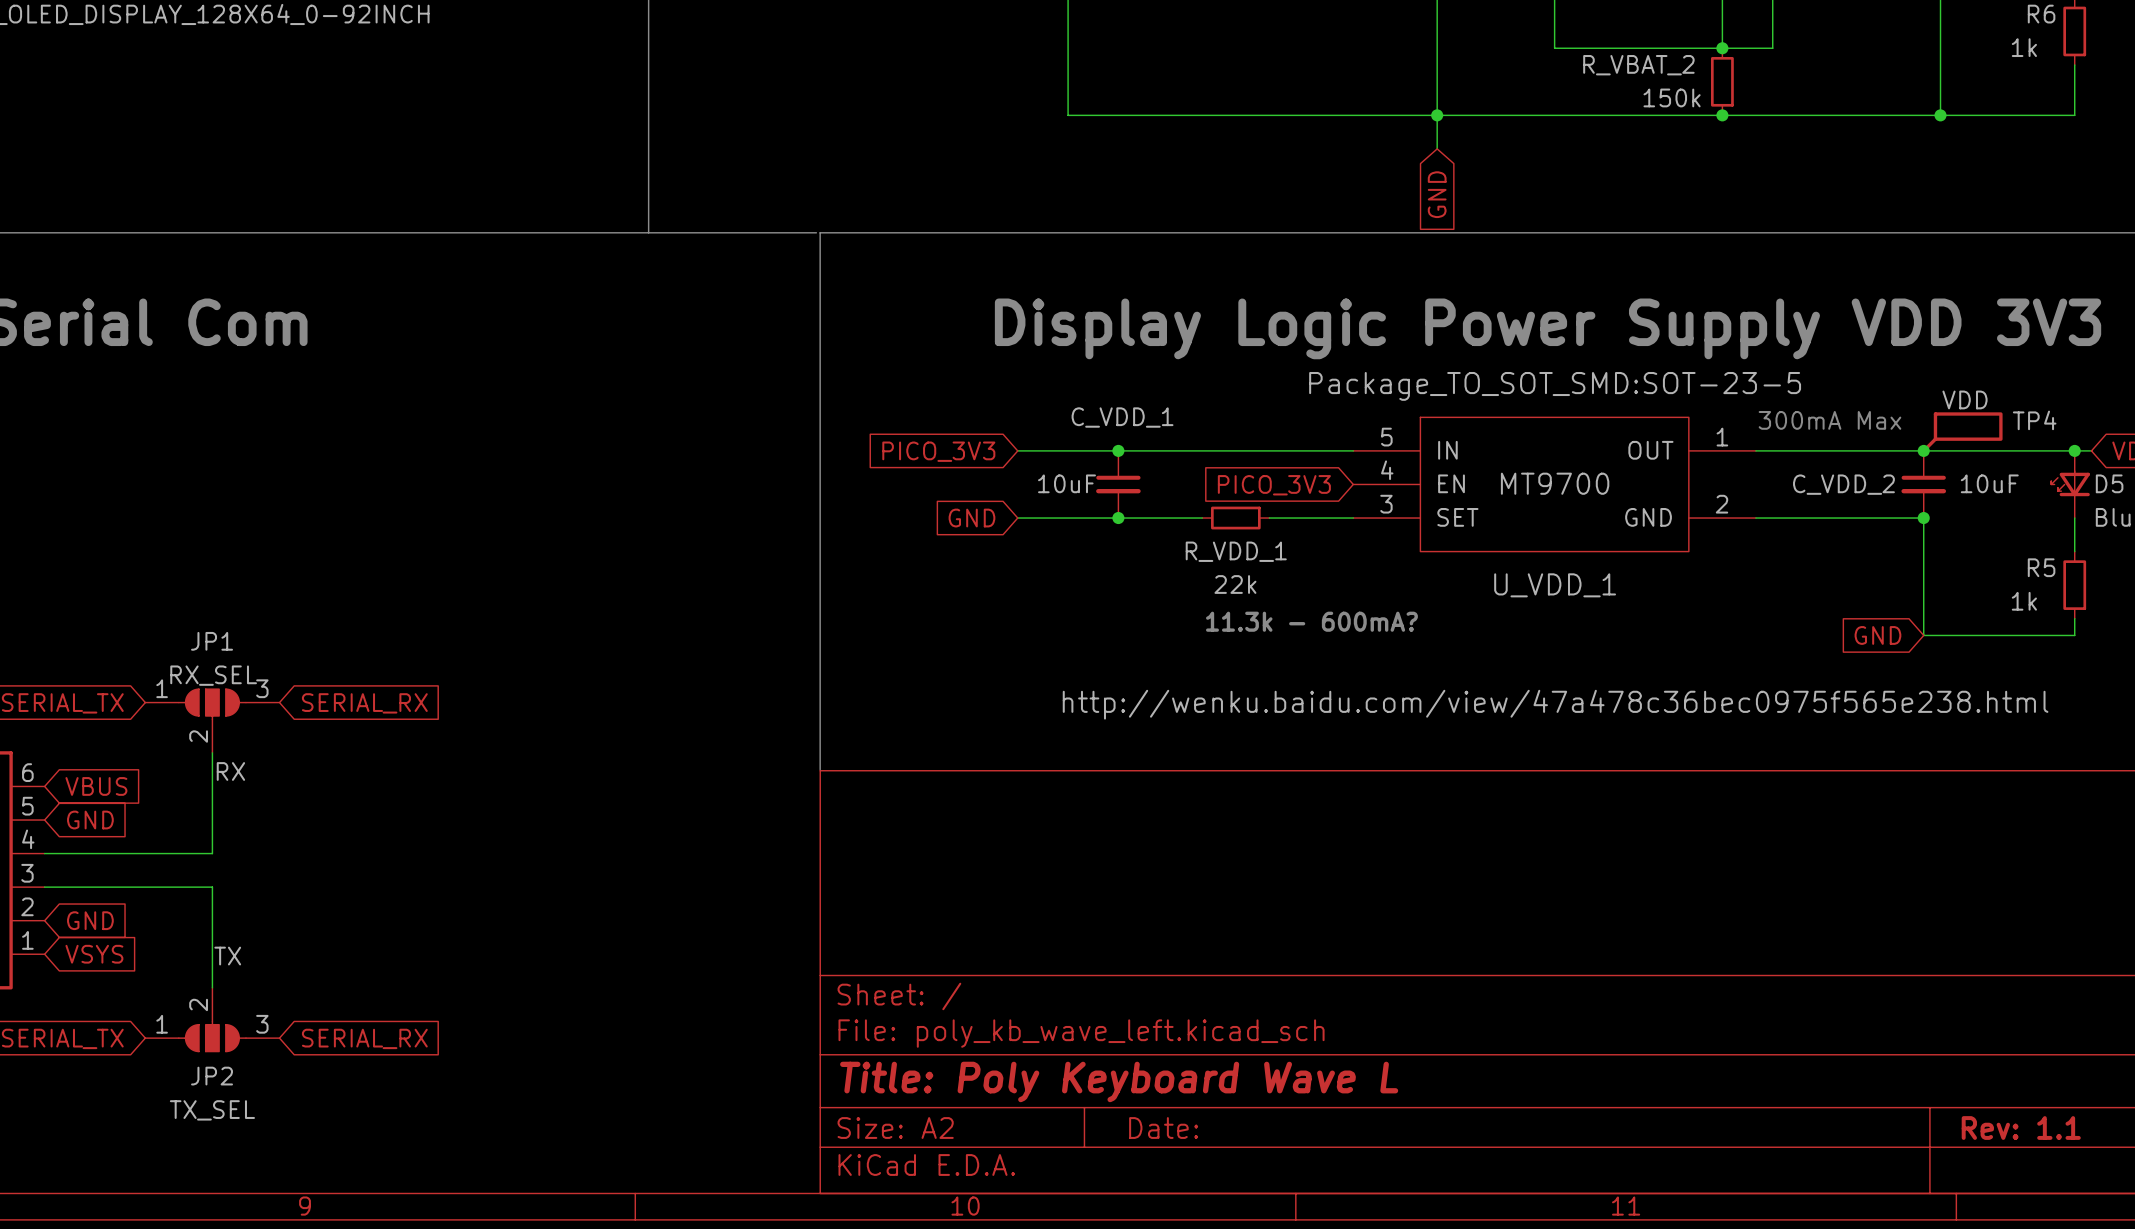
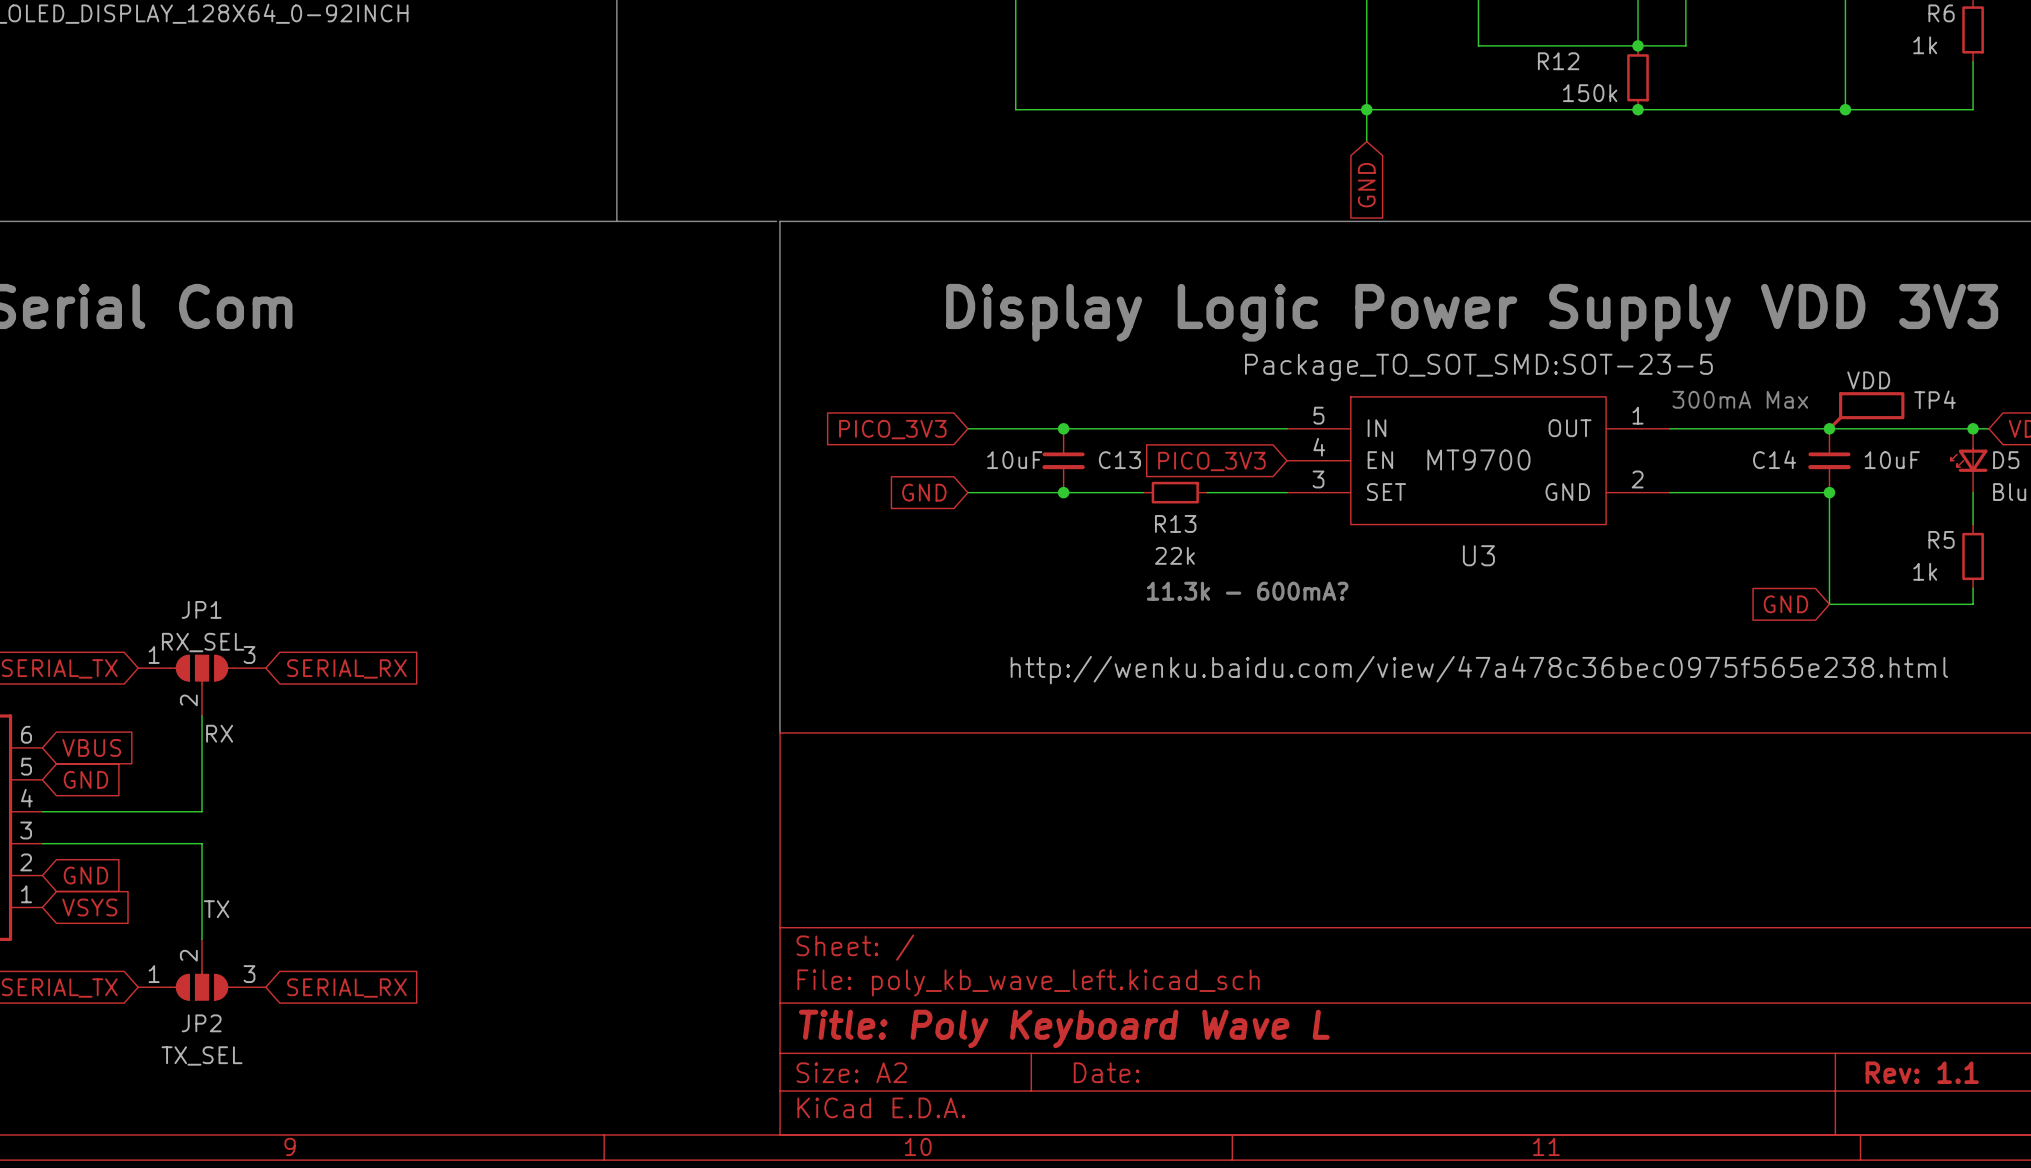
R_VBAT_2 name: R_VBAT_2 (1638, 65) -> R12 (1558, 61)
C_VDD_1 name: C_VDD_1 (1122, 417) -> C13 (1119, 460)
C_VDD_2 name: C_VDD_2 (1843, 484) -> C14 (1774, 459)
R_VDD_1 name: R_VDD_1 (1236, 551) -> R13 (1175, 523)
U_VDD_1 name: U_VDD_1 (1555, 585) -> U3 (1478, 555)

